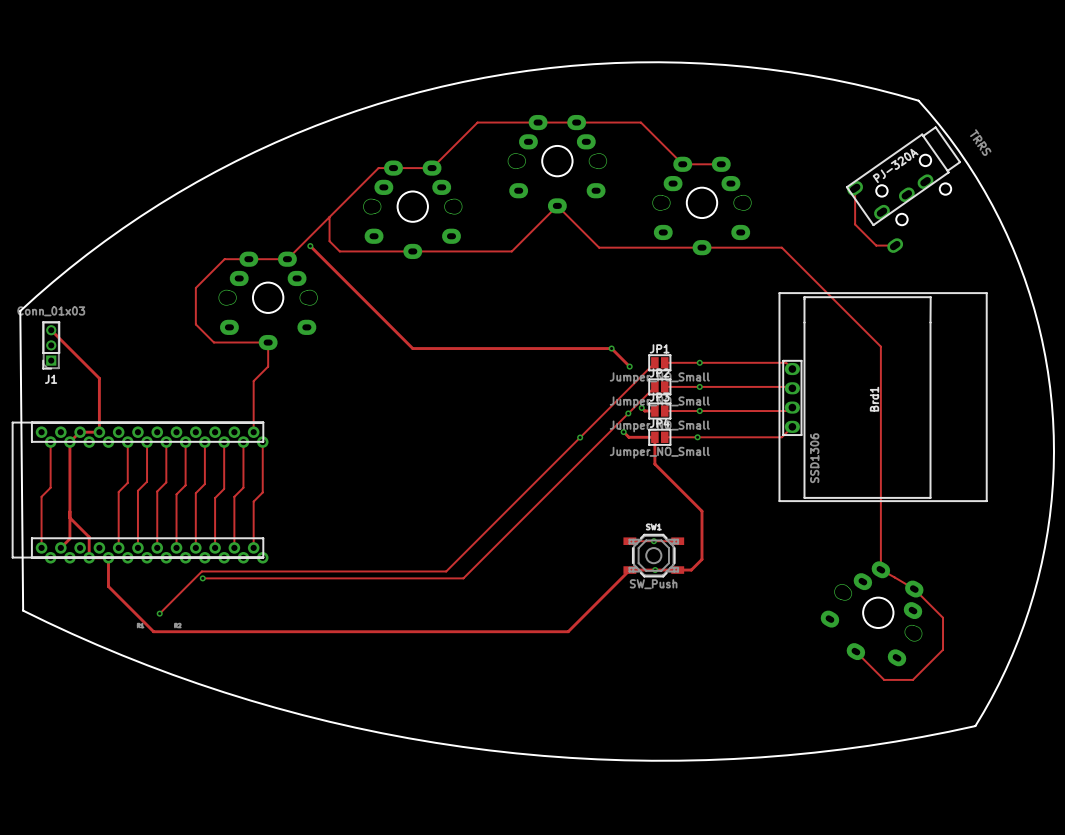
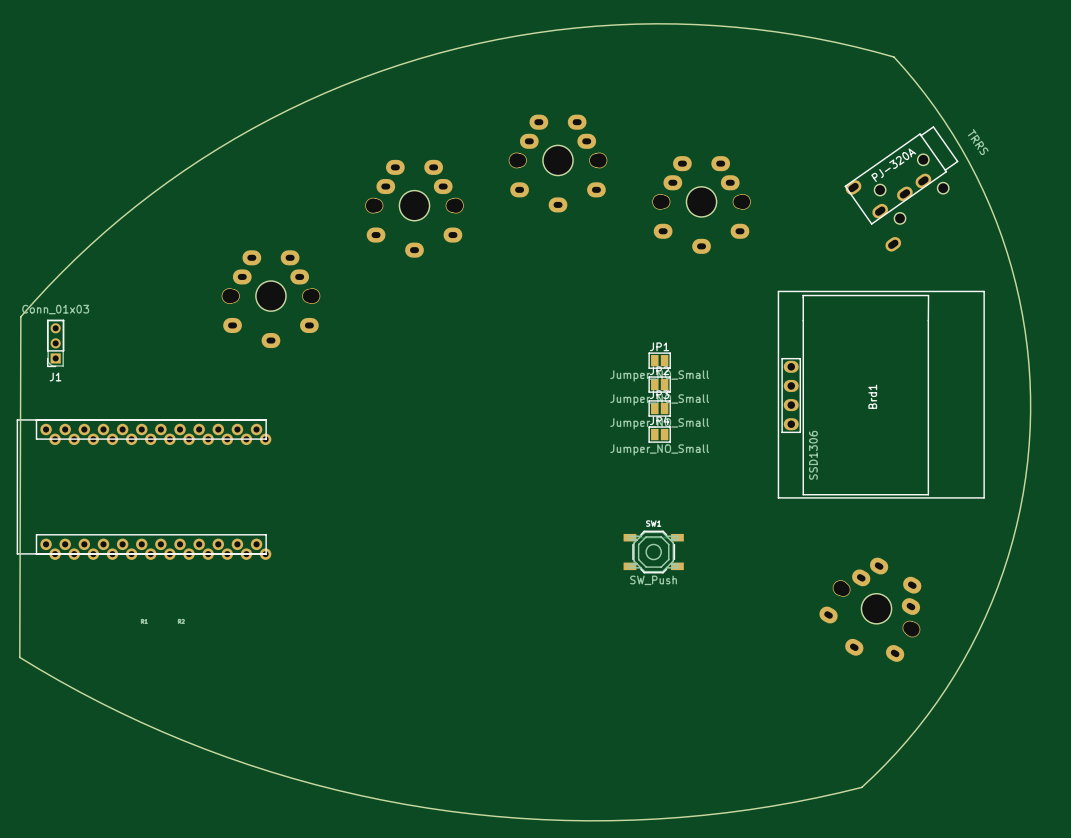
board edge: (918, 100) (967, 163) (1006, 234) (1034, 309) (1045, 356) (1051, 403) (1052, 484) (1047, 531) (1038, 579) (1012, 654) (975, 726) (895, 741) (841, 749) (733, 759) (624, 760) (543, 755) (489, 750) (382, 733) (328, 721) (250, 700) (198, 683) (122, 655) (23, 610) (20, 310) (70, 267) (104, 241) (140, 216) (197, 181) (275, 142) (357, 110) (441, 86) (484, 77) (549, 68) (637, 62) (702, 63) (746, 66) (833, 79) (918, 100) -> (893, 57) (925, 94) (953, 134) (976, 177) (996, 221) (1011, 268) (1022, 315) (1029, 380) (1030, 428) (1025, 477) (1016, 525) (1003, 572) (985, 617) (963, 661) (936, 702) (907, 740) (861, 787) (748, 809) (634, 820) (519, 818) (427, 808) (337, 790) (226, 757) (120, 712) (19, 657) (20, 316) (61, 272) (105, 231) (184, 170) (270, 118) (343, 85) (438, 53) (536, 32) (616, 24) (716, 25) (796, 34) (893, 57)
track: (721, 164) (682, 164) (640, 122) (477, 122) (432, 168) (378, 168) (287, 259) (224, 259) (195, 287) (195, 324) (213, 342) (268, 342) -> none
track: (855, 188) (855, 224) (876, 245) (895, 245) -> none
track: (329, 217) (329, 241) (339, 251) (511, 251) (557, 205) (599, 247) (781, 247) (880, 346) (880, 569) (914, 589) (943, 617) (943, 649) (912, 679) (884, 679) (855, 651) -> none
track: (310, 246) (412, 348) (611, 348) (629, 366) -> none
via: (310, 246) -> none
track: (51, 330) (99, 378) (99, 432) (79, 432) (69, 442) (69, 538) (60, 547) -> none
track: (268, 342) (268, 366) (253, 381) (253, 432) -> none
via: (611, 348) -> none
track: (654, 362) (446, 571) (201, 571) (159, 613) -> none
track: (664, 362) (786, 362) (792, 369) -> none
via: (699, 362) -> none
via: (629, 366) -> none
track: (654, 386) (463, 578) (202, 578) -> none
track: (664, 386) (792, 388) -> none
via: (699, 386) -> none
track: (641, 407) (644, 411) (654, 411) -> none
via: (641, 407) -> none
track: (792, 407) (788, 411) (664, 411) -> none
via: (699, 411) -> none
via: (628, 413) -> none
track: (792, 426) (781, 437) (664, 437) -> none
track: (623, 432) (628, 437) (654, 437) (654, 464) (702, 511) (702, 559) (691, 570) (629, 570) (568, 631) (153, 631) (108, 586) (108, 557) (89, 557) (89, 537) (69, 517) -> none
via: (623, 432) -> none
via: (580, 437) -> none
via: (697, 437) -> none
track: (50, 442) (50, 487) (41, 496) (41, 547) -> none
track: (127, 442) (127, 482) (118, 491) (118, 547) -> none
track: (147, 442) (147, 481) (137, 490) (137, 547) -> none
track: (166, 442) (166, 482) (157, 491) (157, 547) -> none
track: (185, 442) (185, 485) (176, 494) (176, 547) -> none
track: (204, 442) (204, 484) (195, 493) (195, 547) -> none
track: (224, 442) (224, 488) (215, 498) (215, 547) -> none
track: (243, 442) (243, 487) (234, 496) (234, 547) -> none
track: (262, 442) (262, 492) (253, 501) (253, 547) -> none
via: (653, 541) -> none
via: (655, 570) -> none
via: (202, 578) -> none
via: (159, 613) -> none

